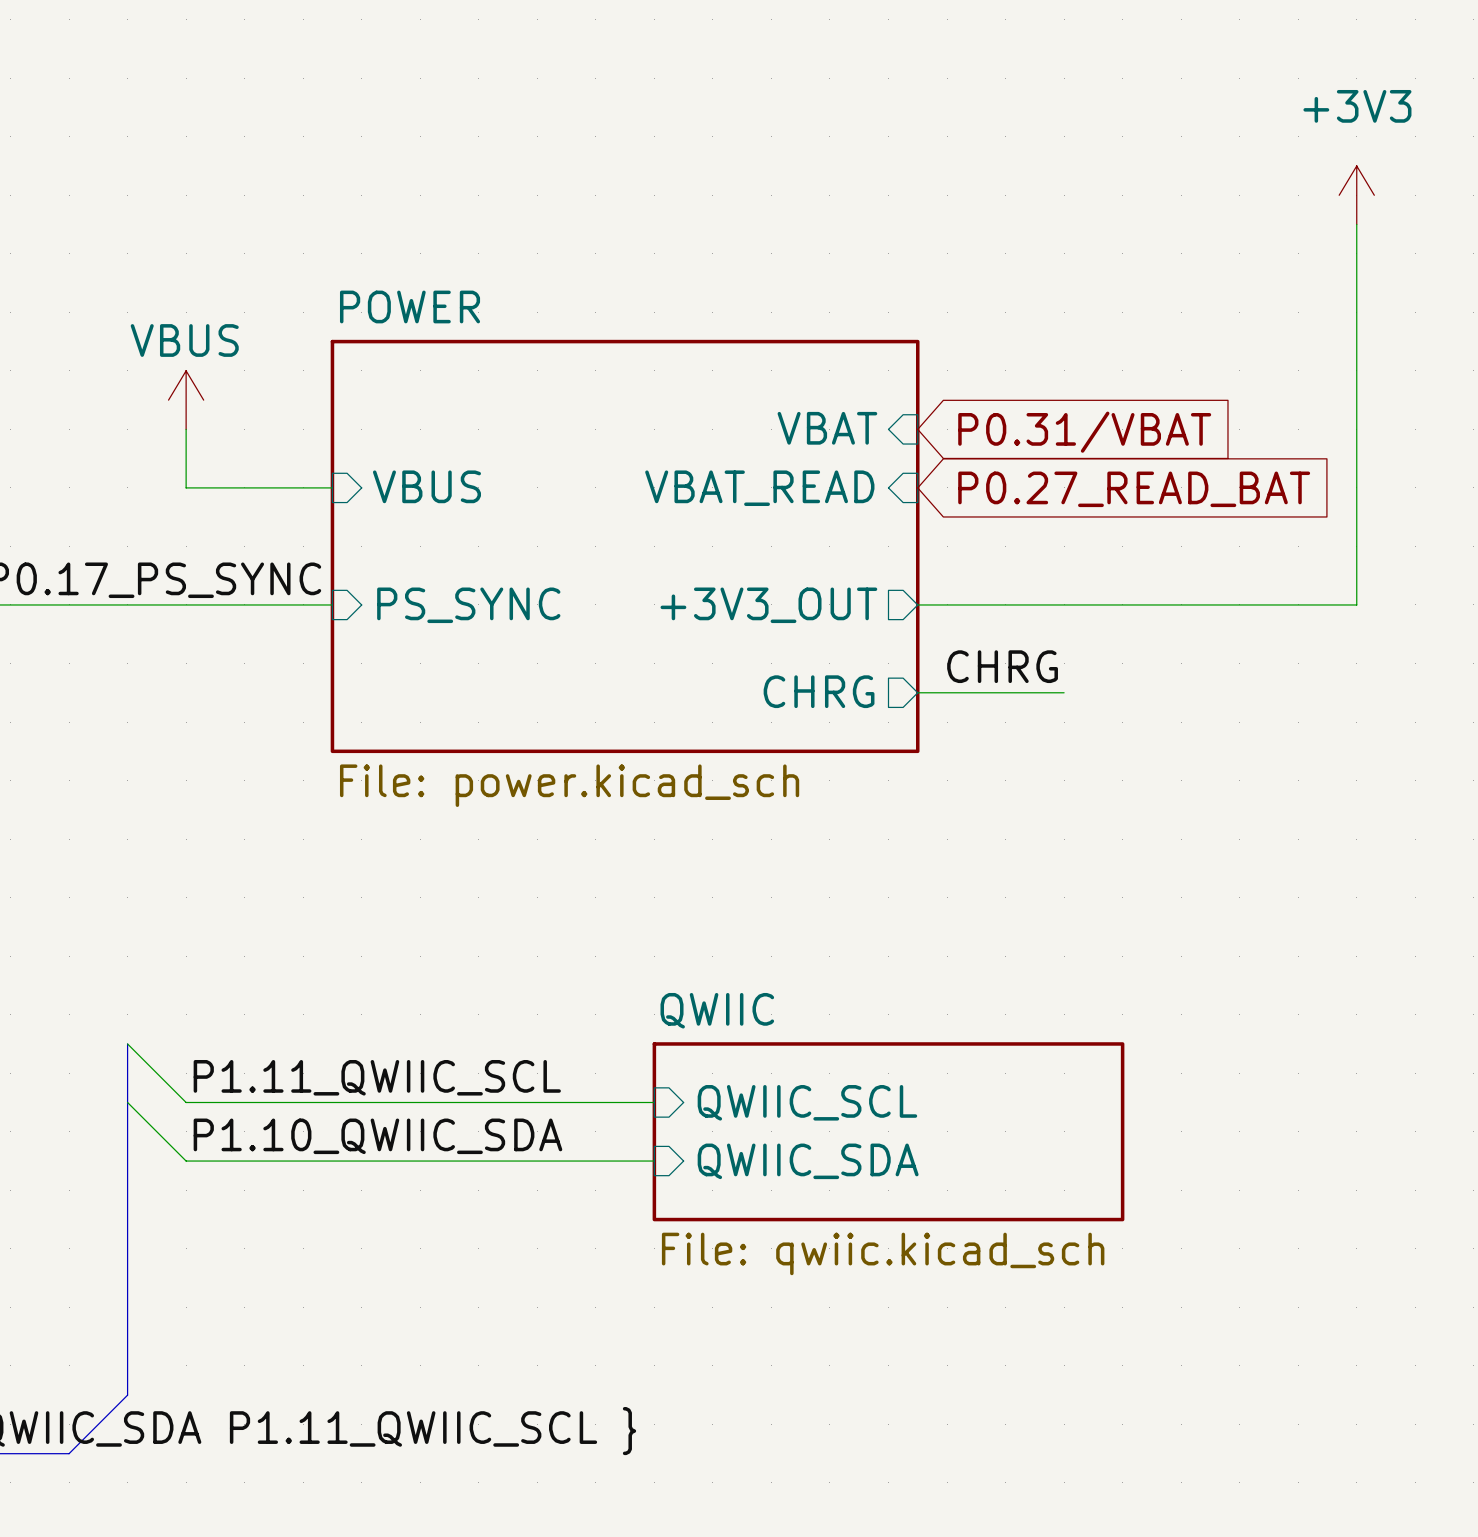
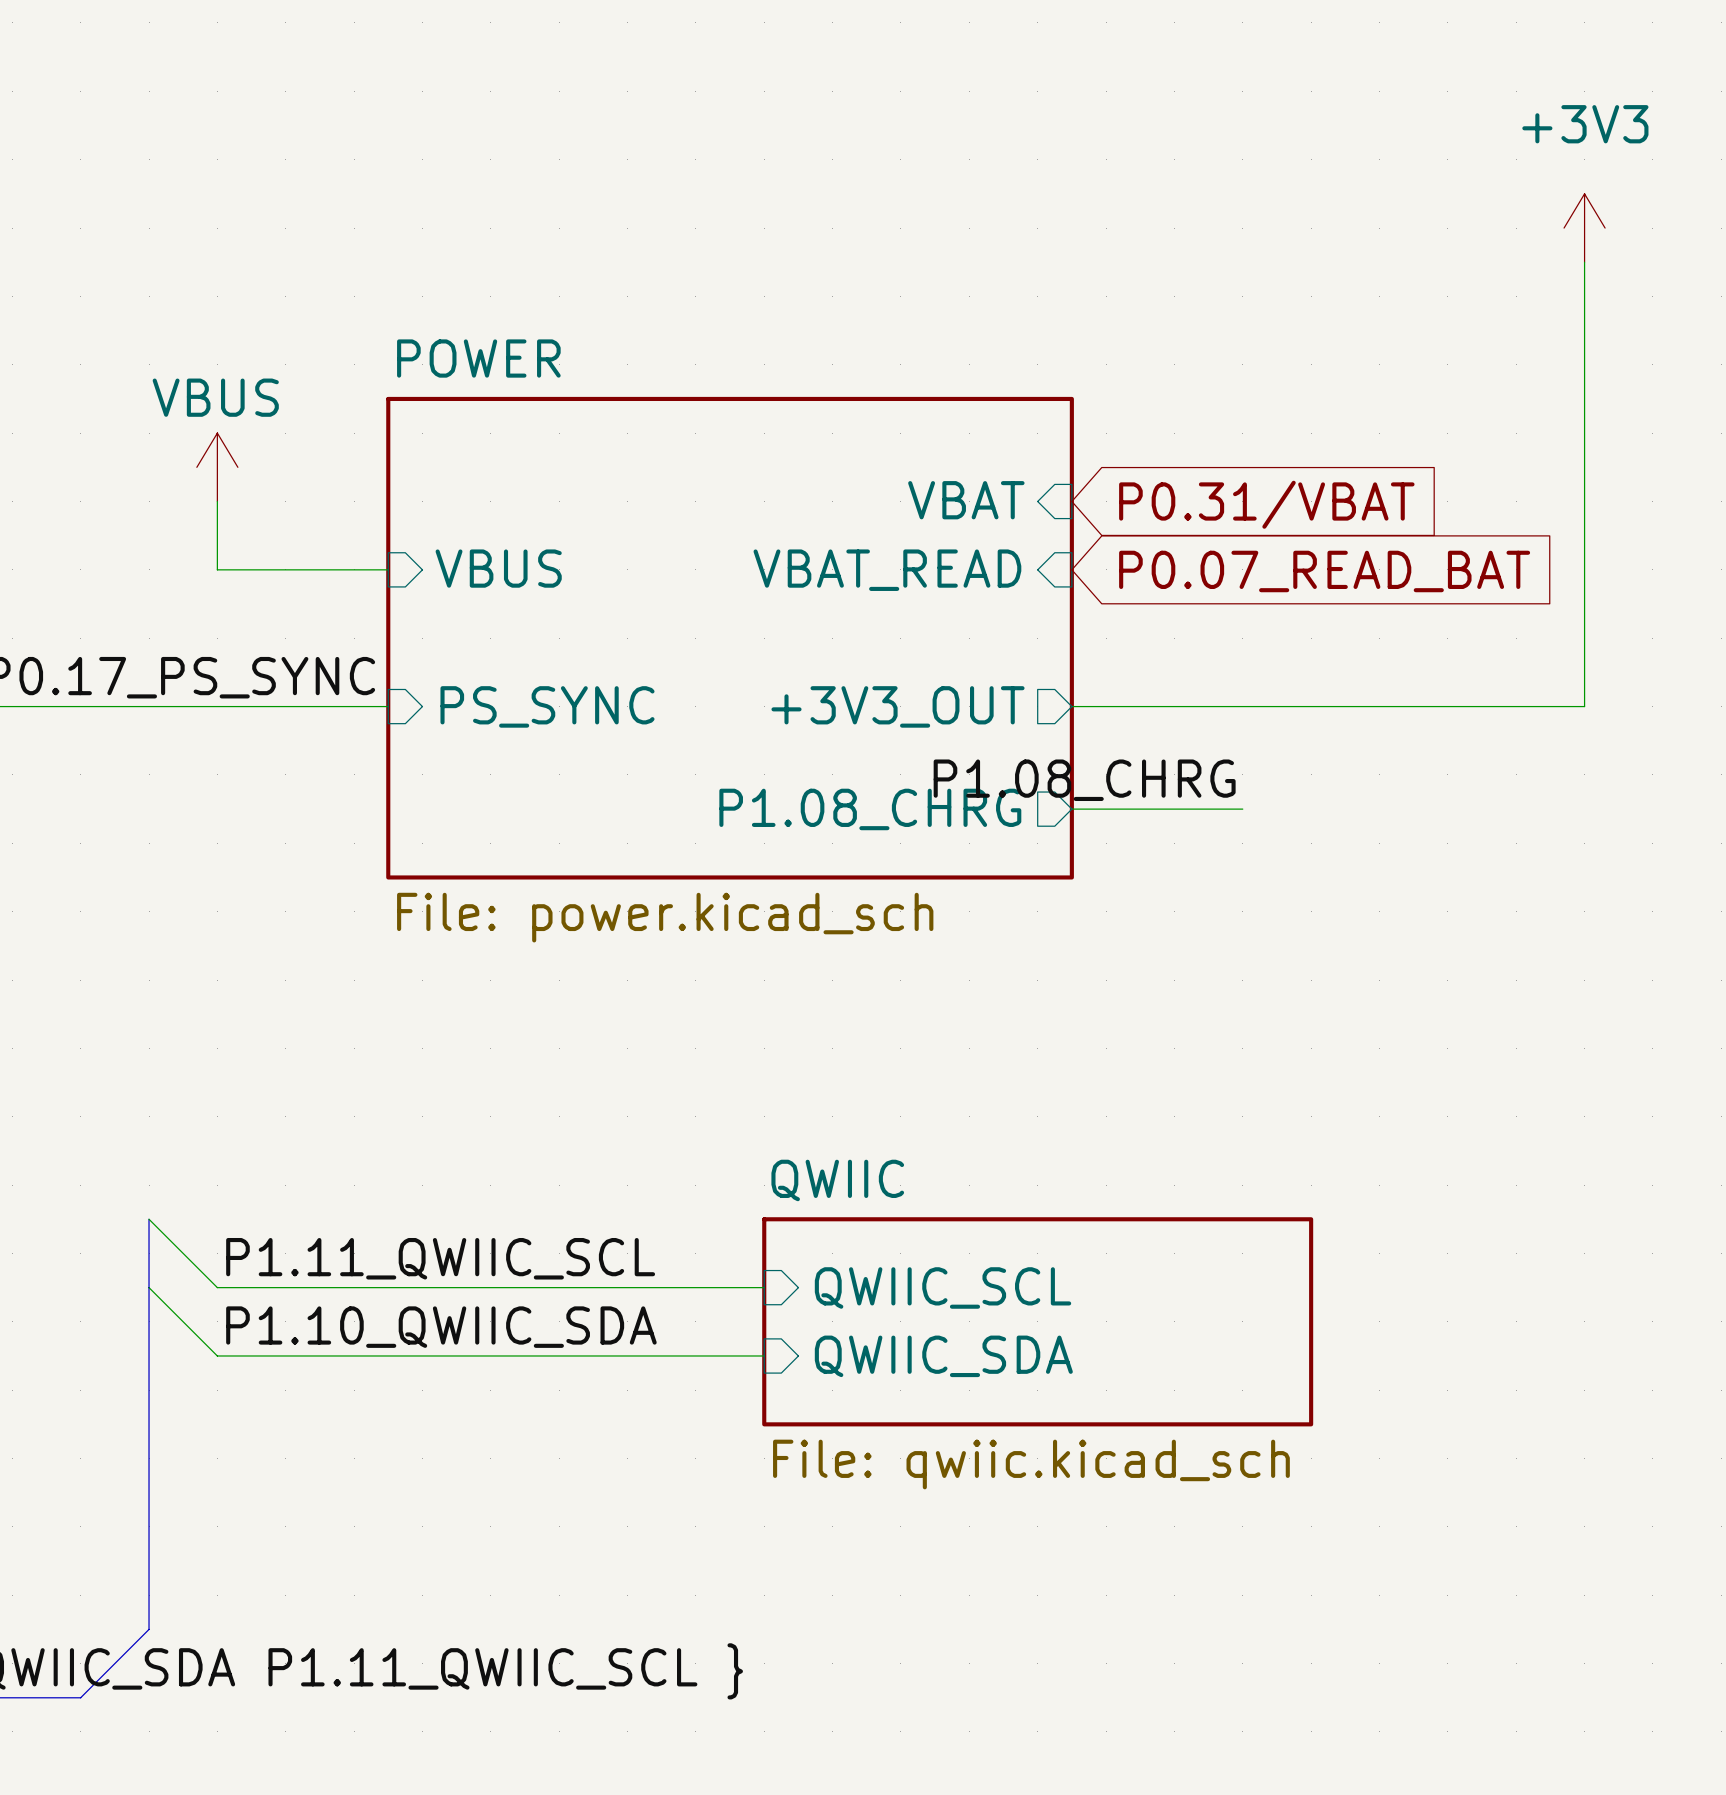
global label: P0.27_READ_BAT (1134, 489) -> P0.07_READ_BAT (1324, 571)
label: CHRG (1002, 666) -> P1.08_CHRG (1084, 780)
sheet pin: CHRG (819, 691) -> P1.08_CHRG (870, 809)

